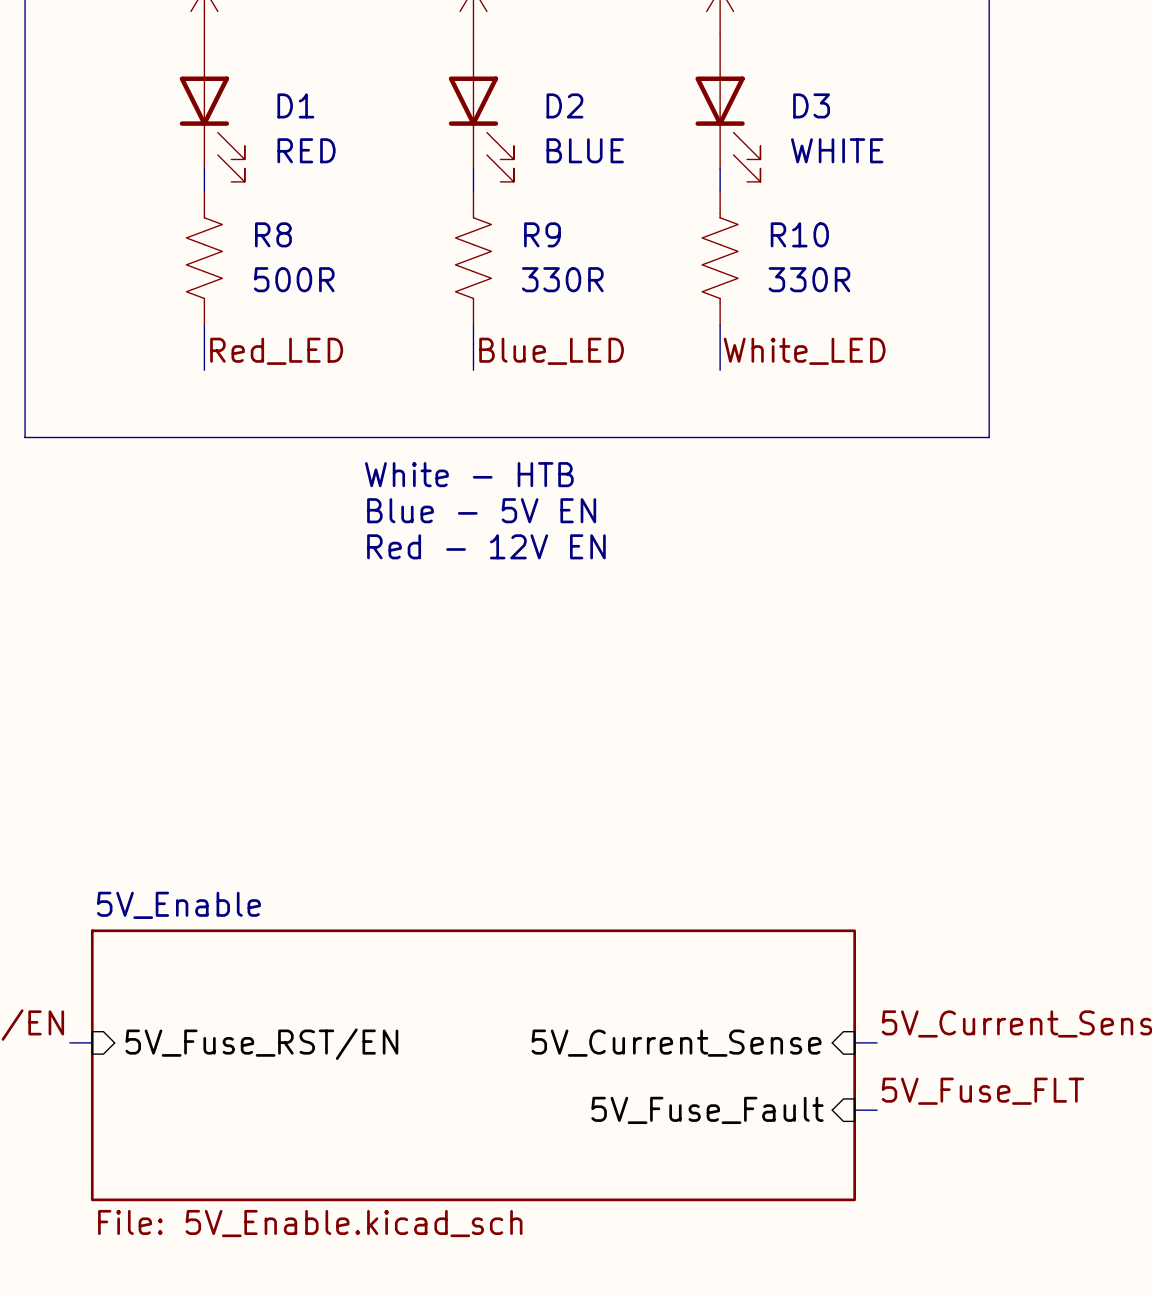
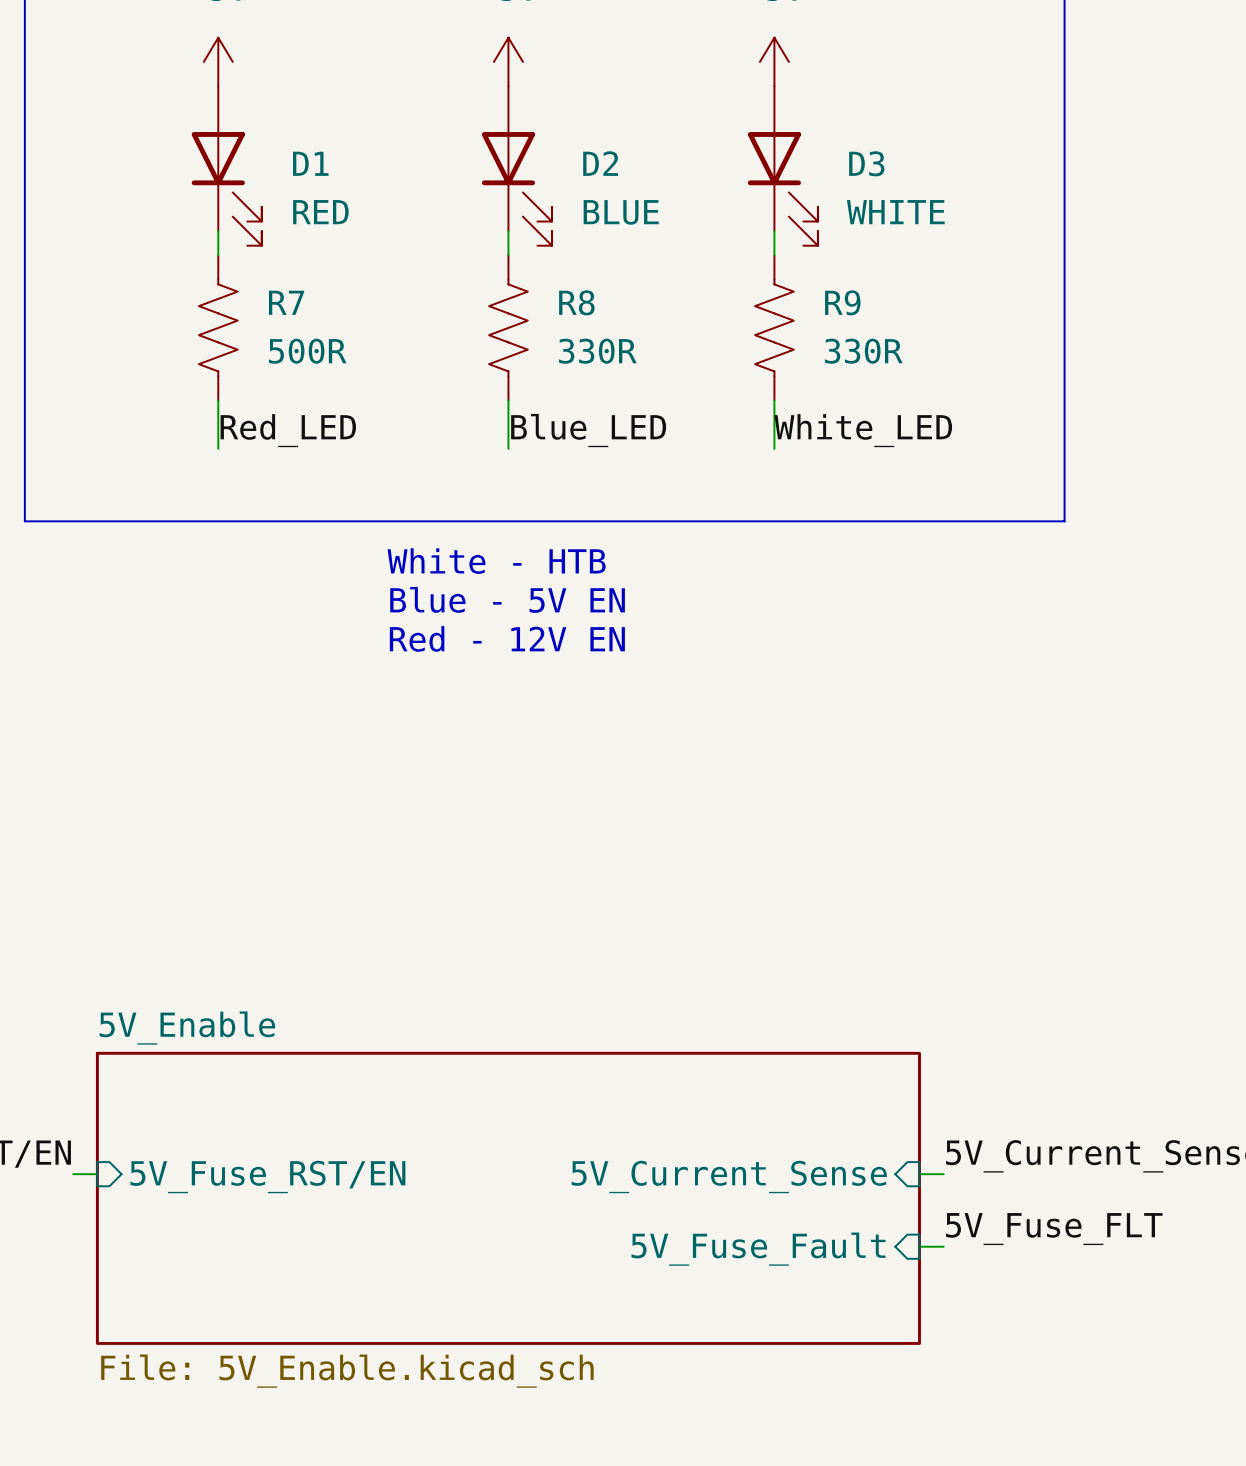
R8 name: R8 (273, 234) -> R7 (286, 302)
R9 name: R9 (542, 234) -> R8 (576, 302)
R10 name: R10 (799, 234) -> R9 (842, 302)

